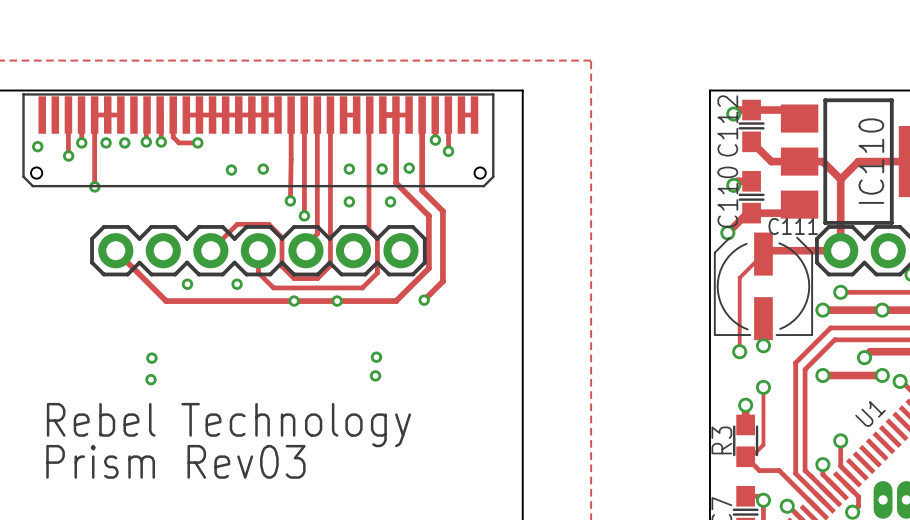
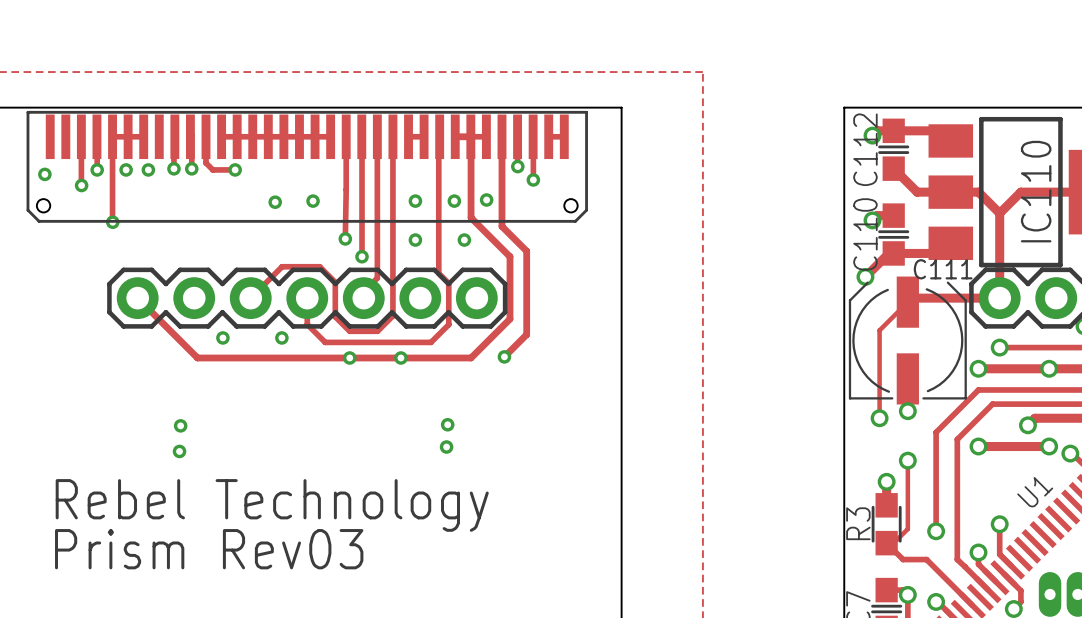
track: (830, 327) (795, 362) (795, 473) (824, 502) -> (987, 389) (978, 389) (936, 432) (936, 531)
via: none -> (936, 531)

